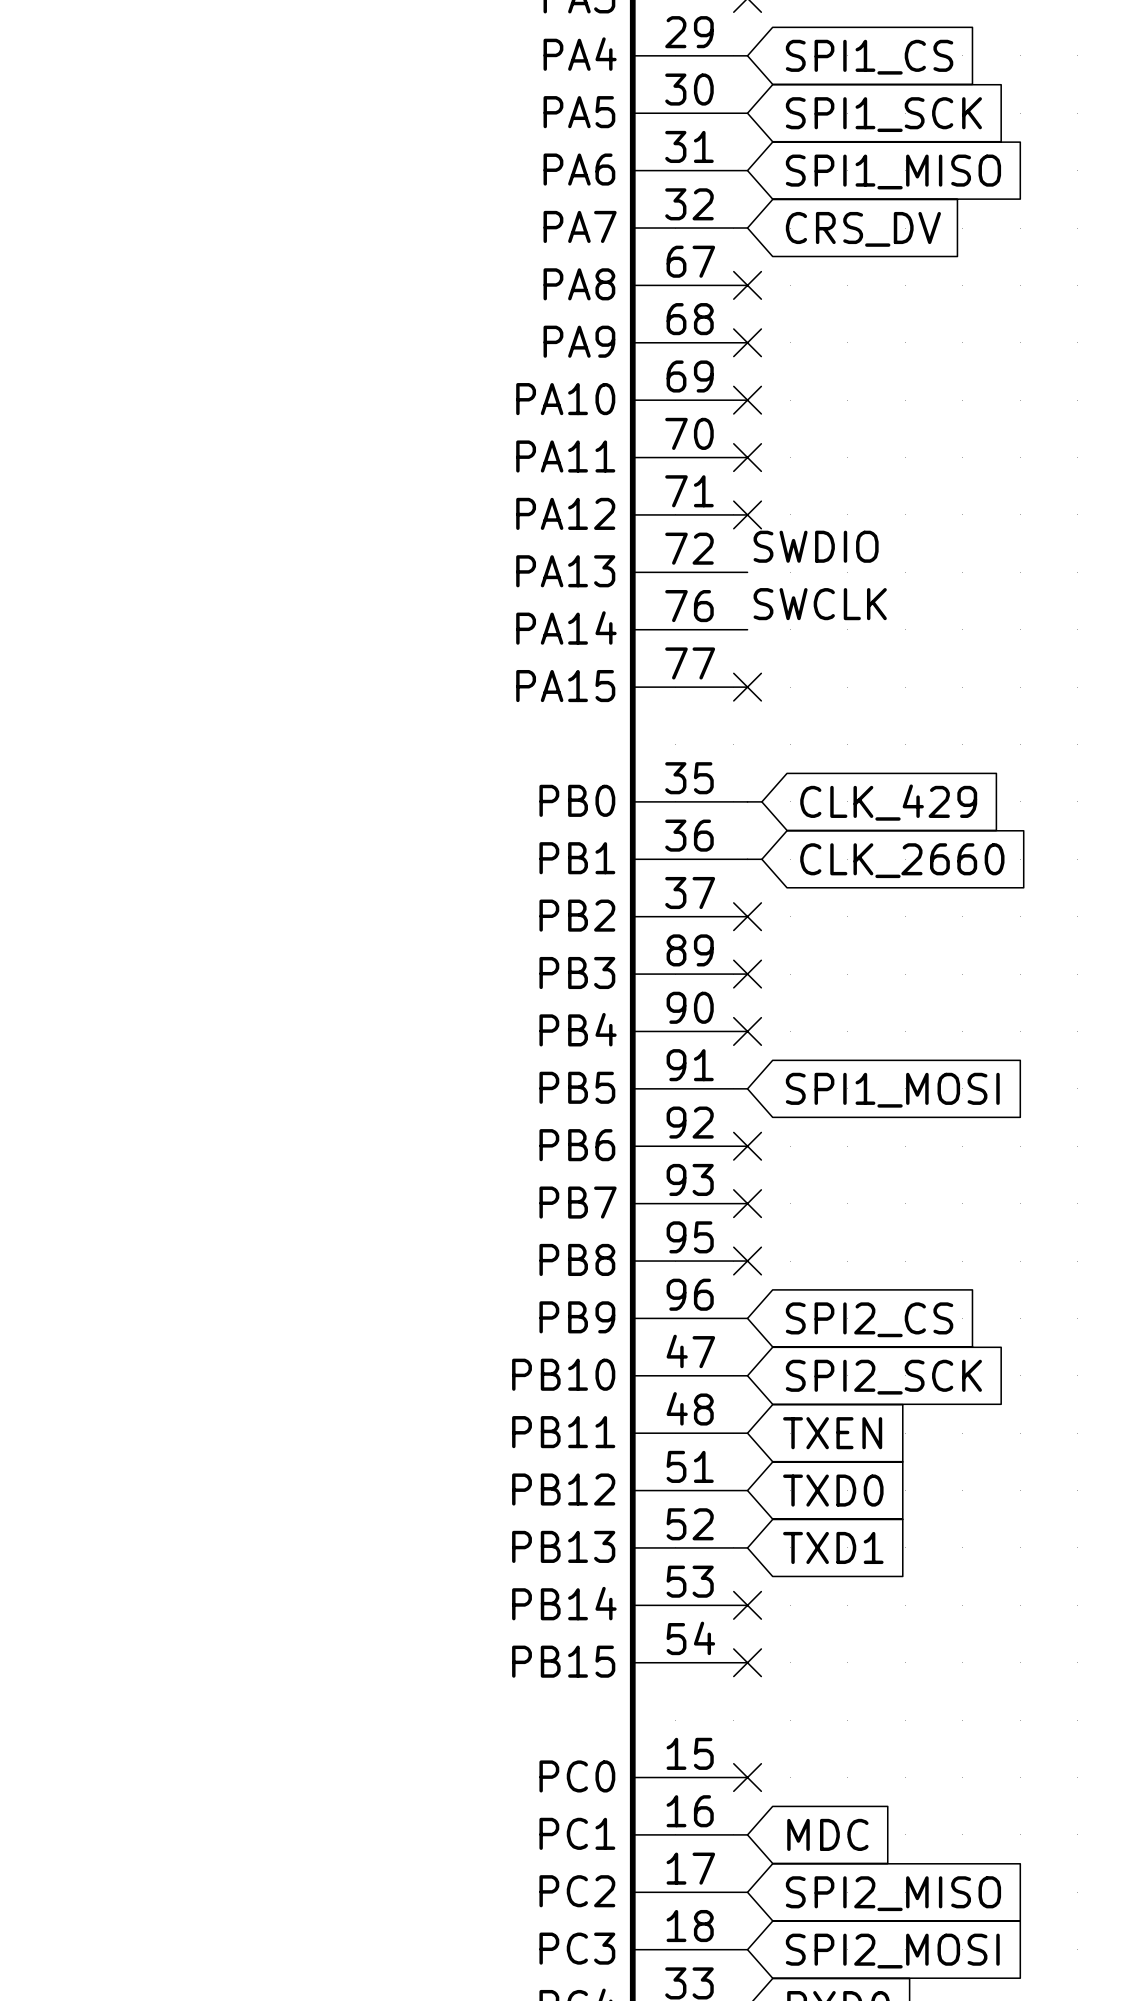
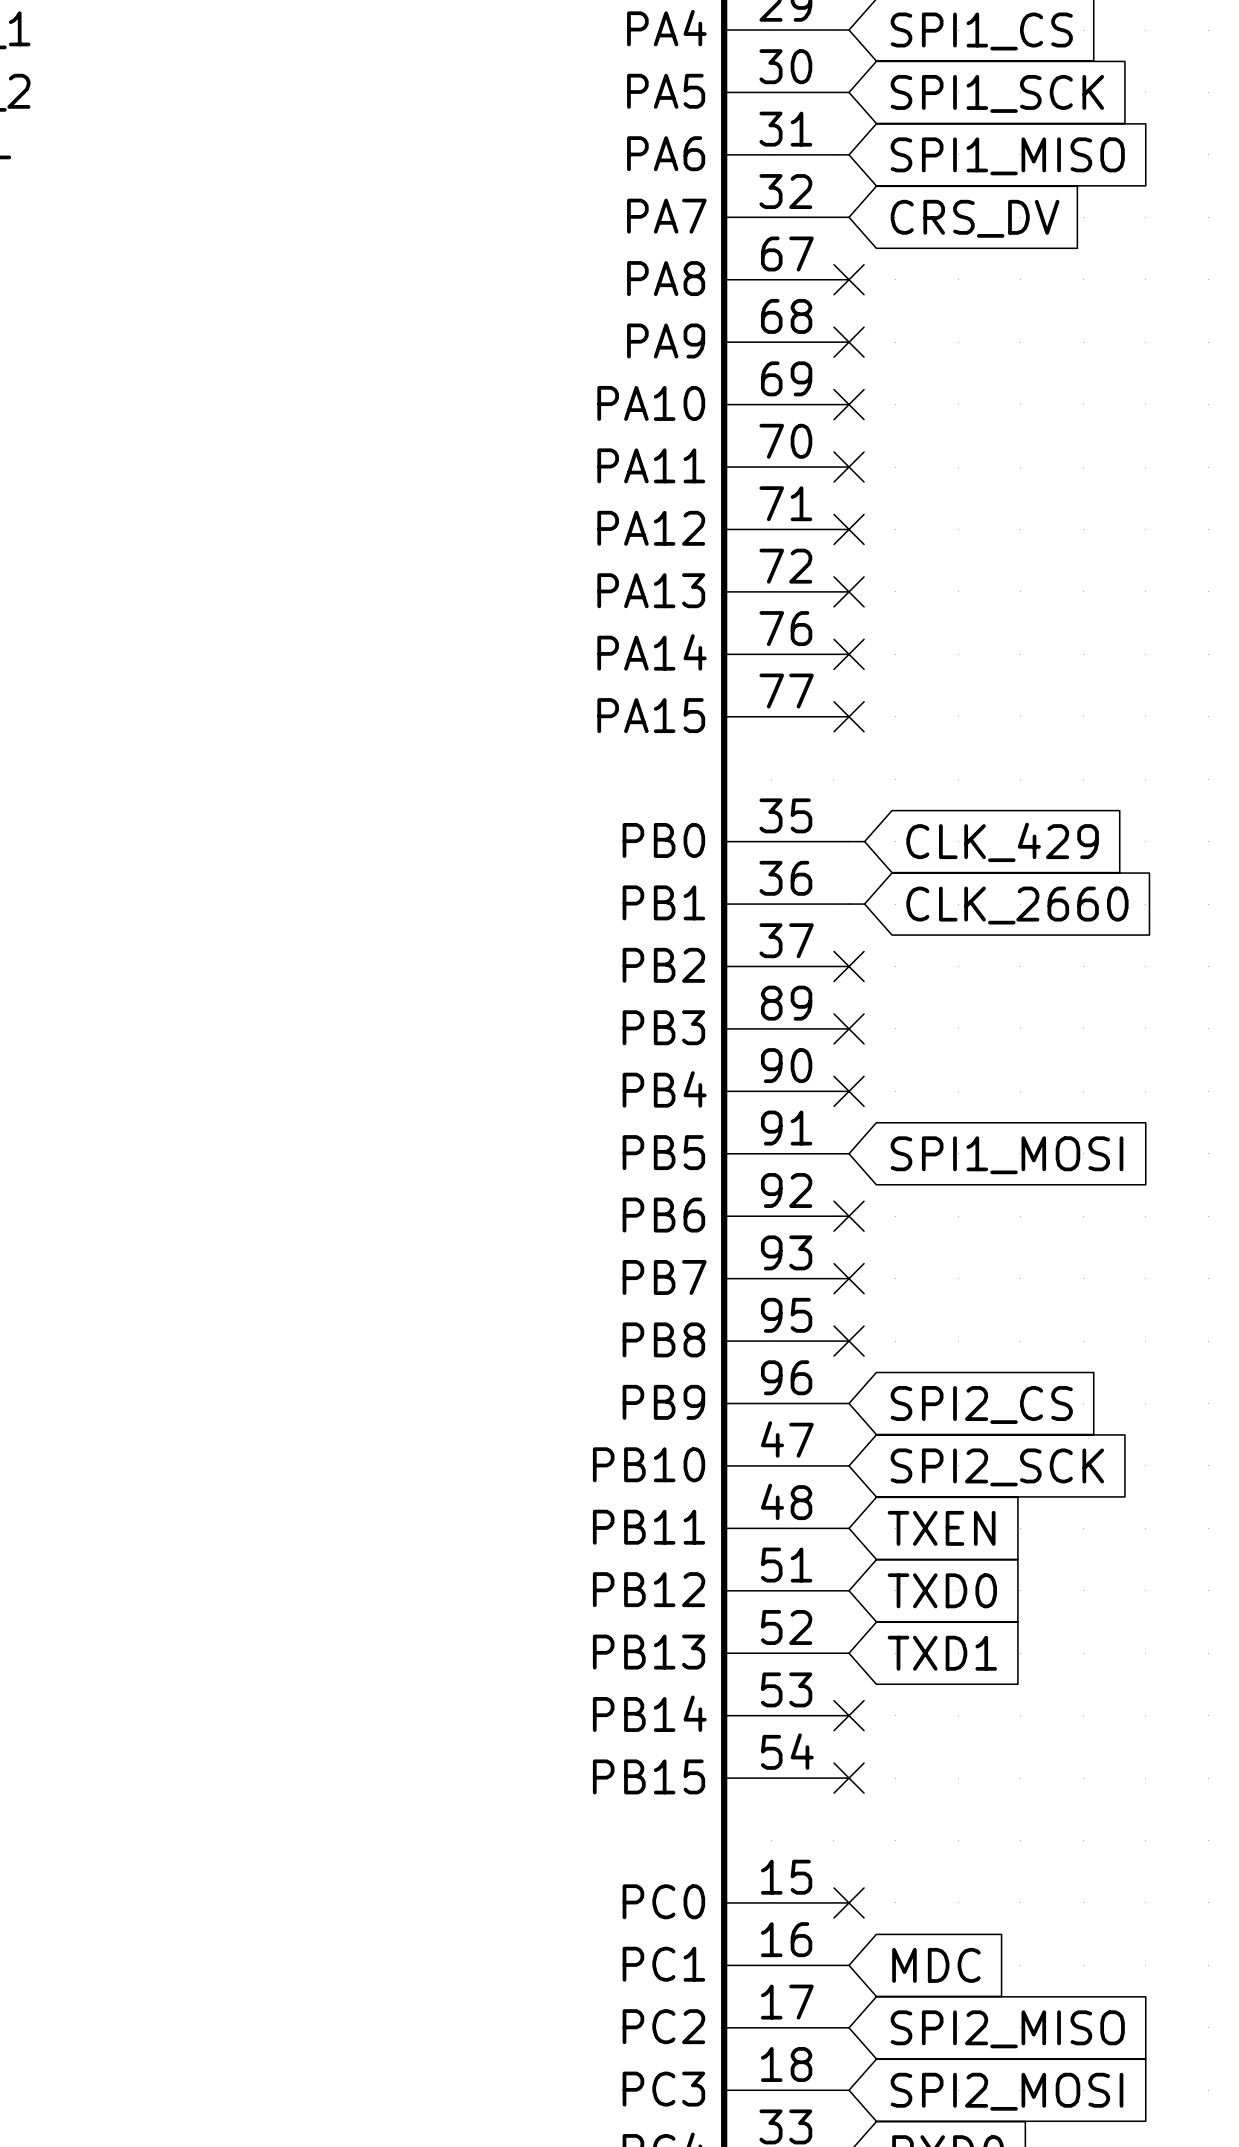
label: SWDIO (816, 546) -> none
no-connect mark: none -> (849, 591)
label: SWCLK (820, 604) -> none
no-connect mark: none -> (849, 654)

